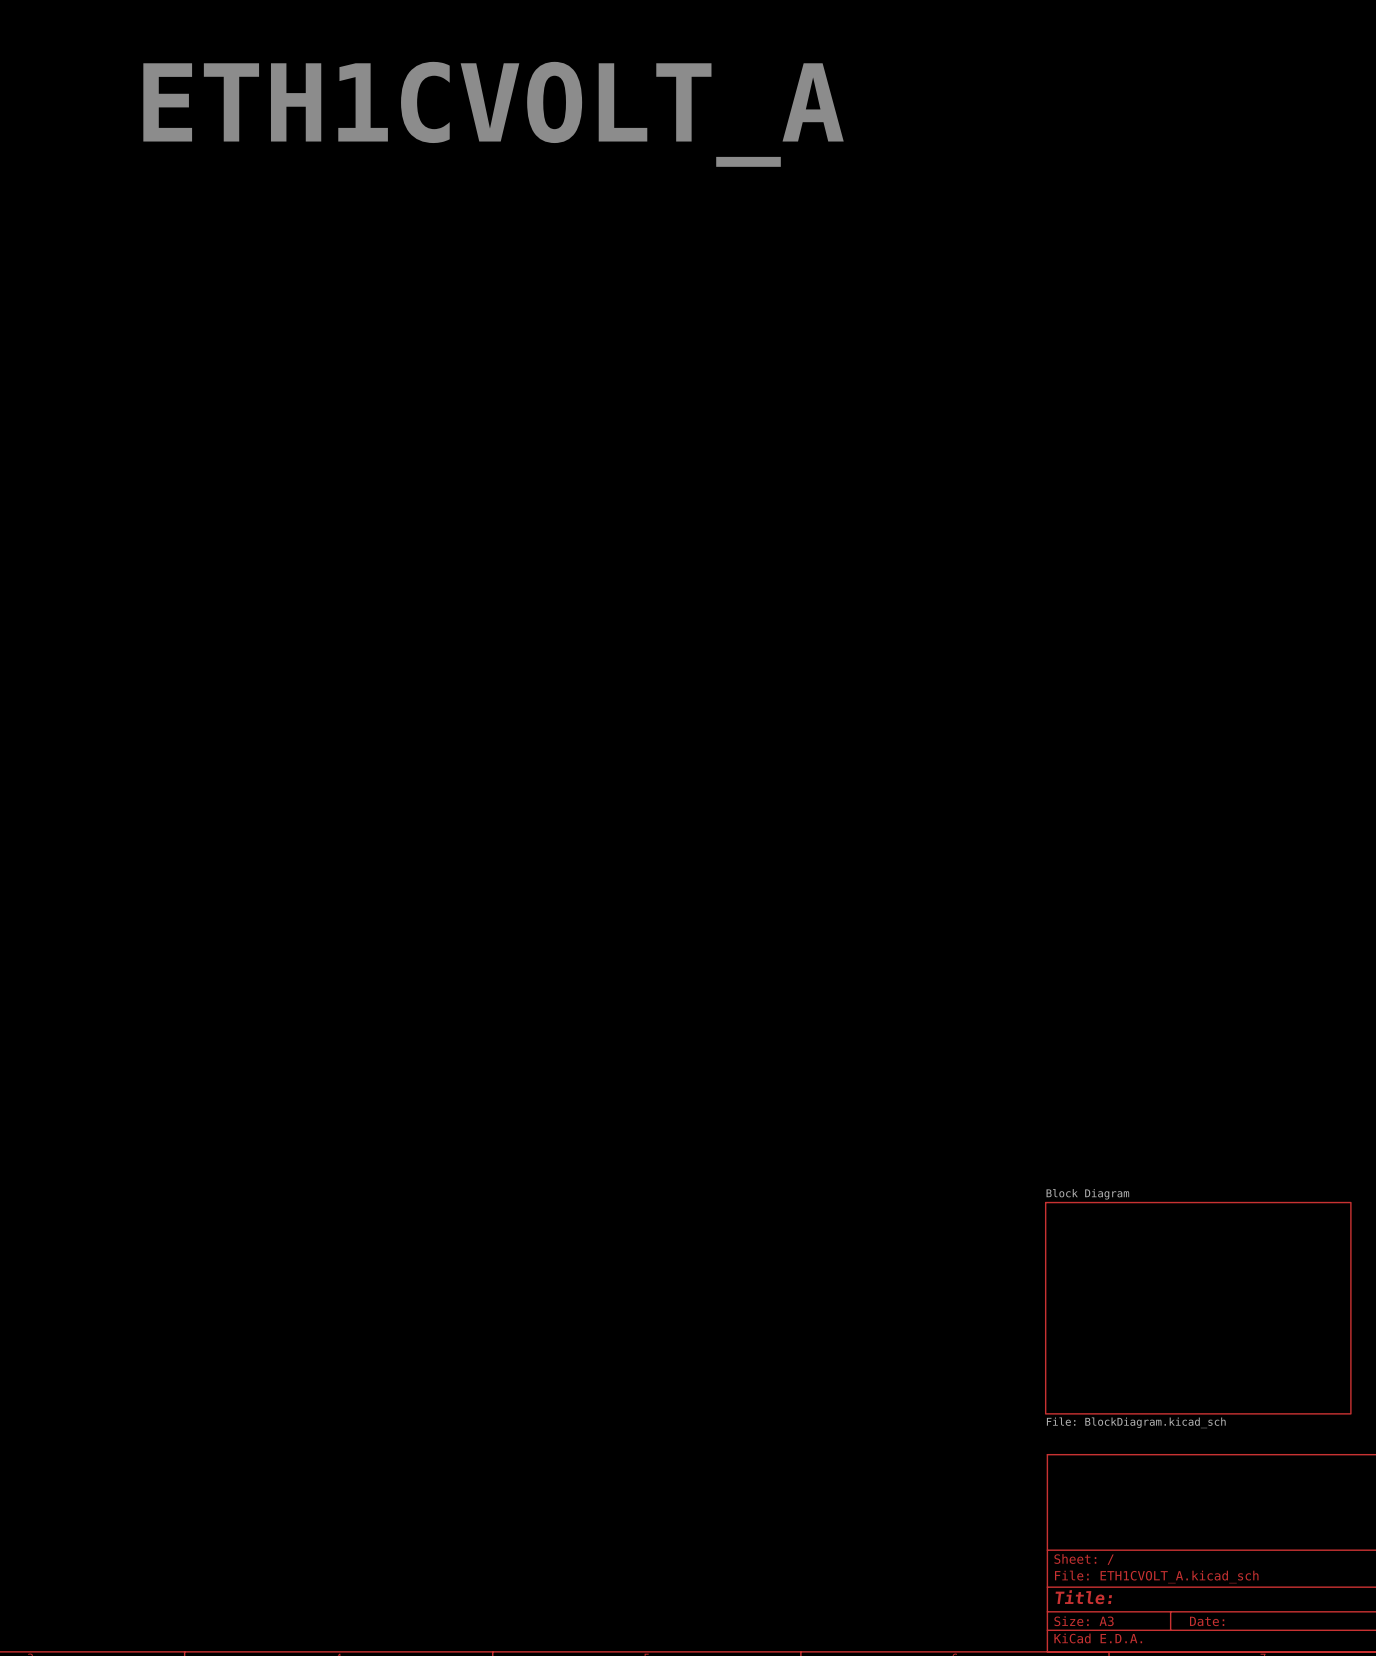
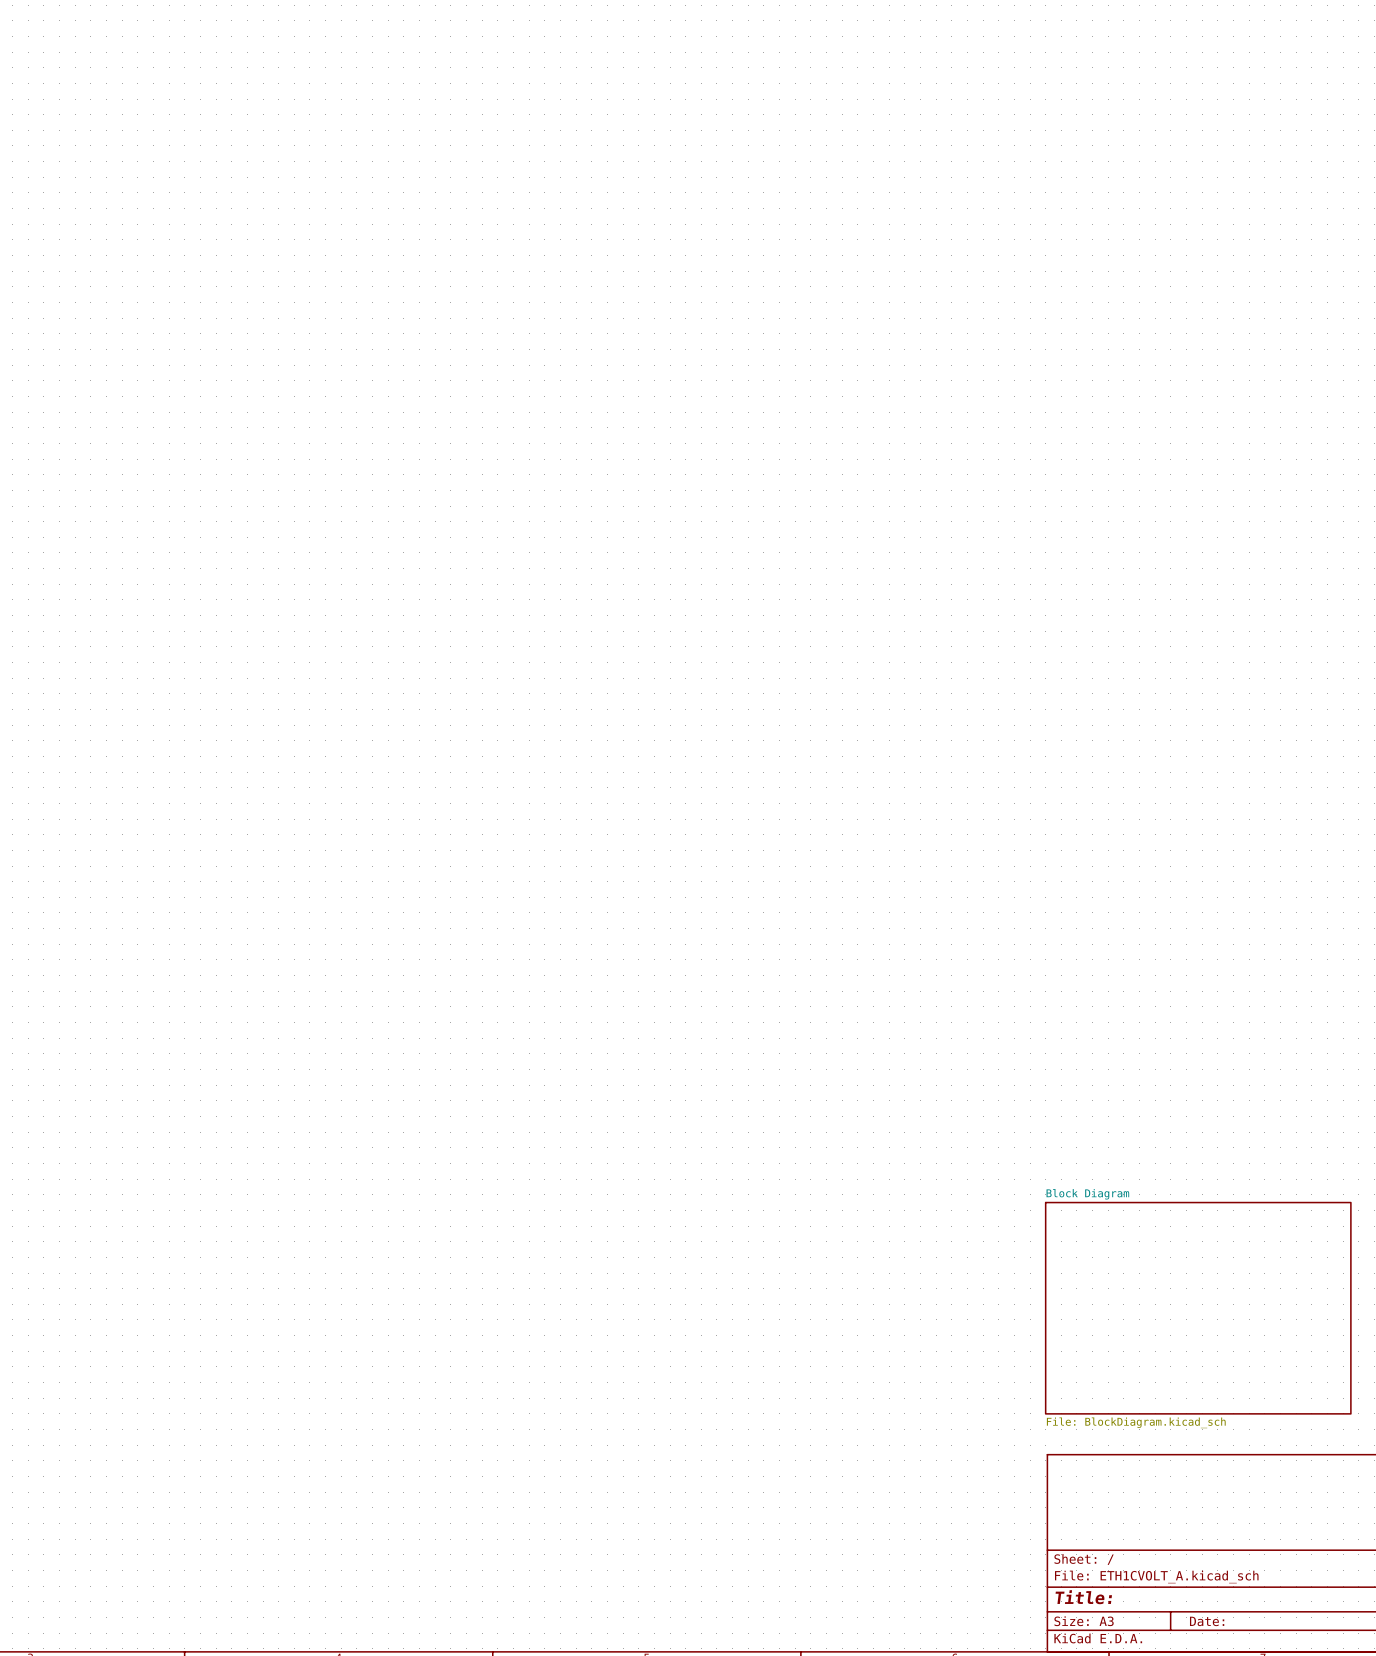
text: ETH1CVOLT_A (493, 114) -> none

